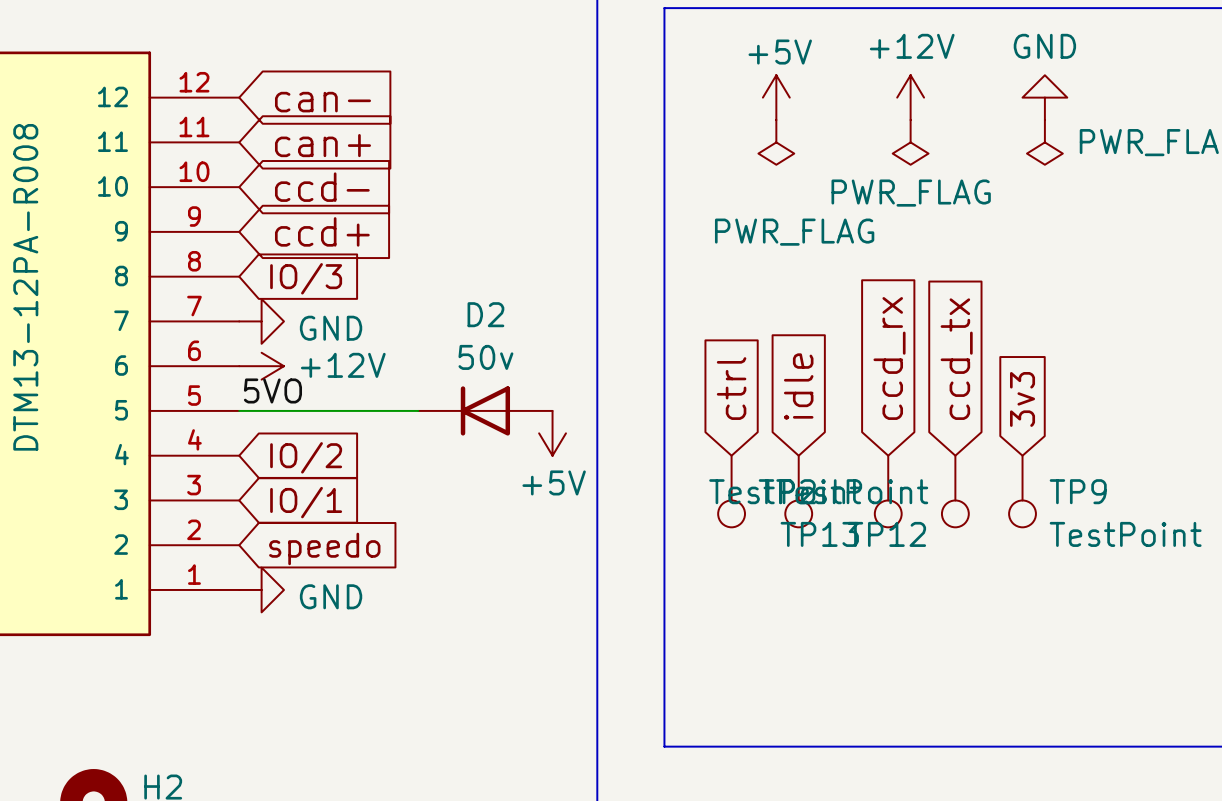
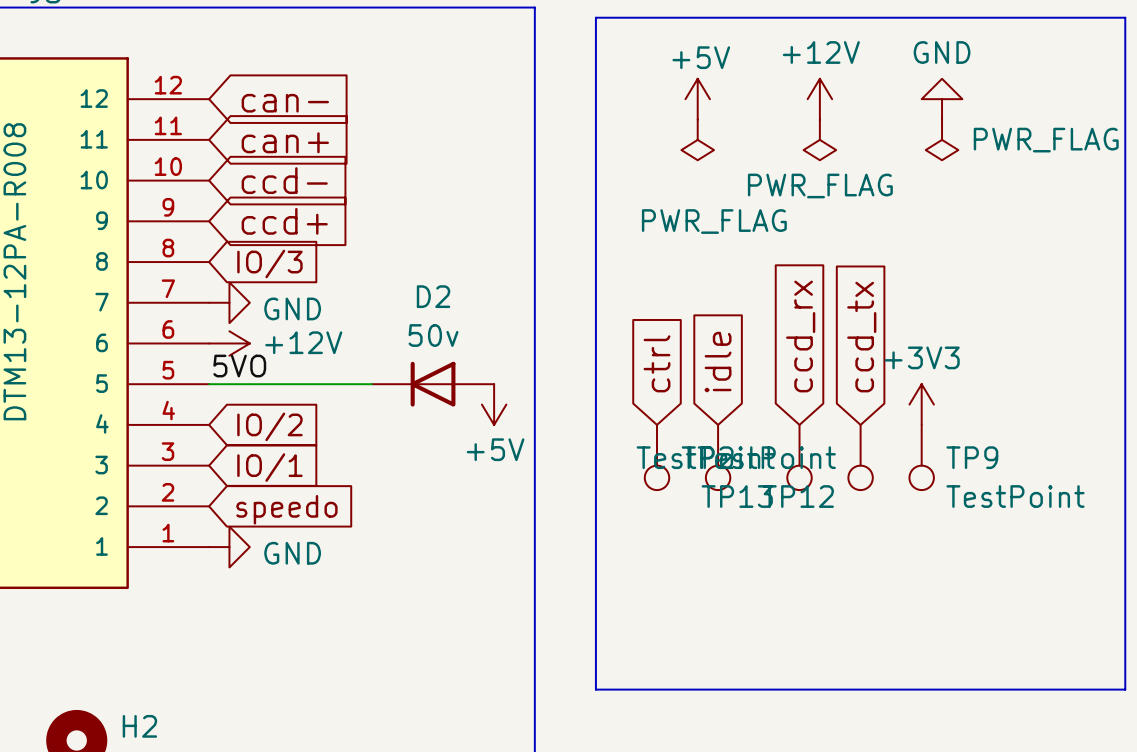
global label: 3v3 (1022, 399) -> none
power symbol: none -> +3V3 (921, 404)

